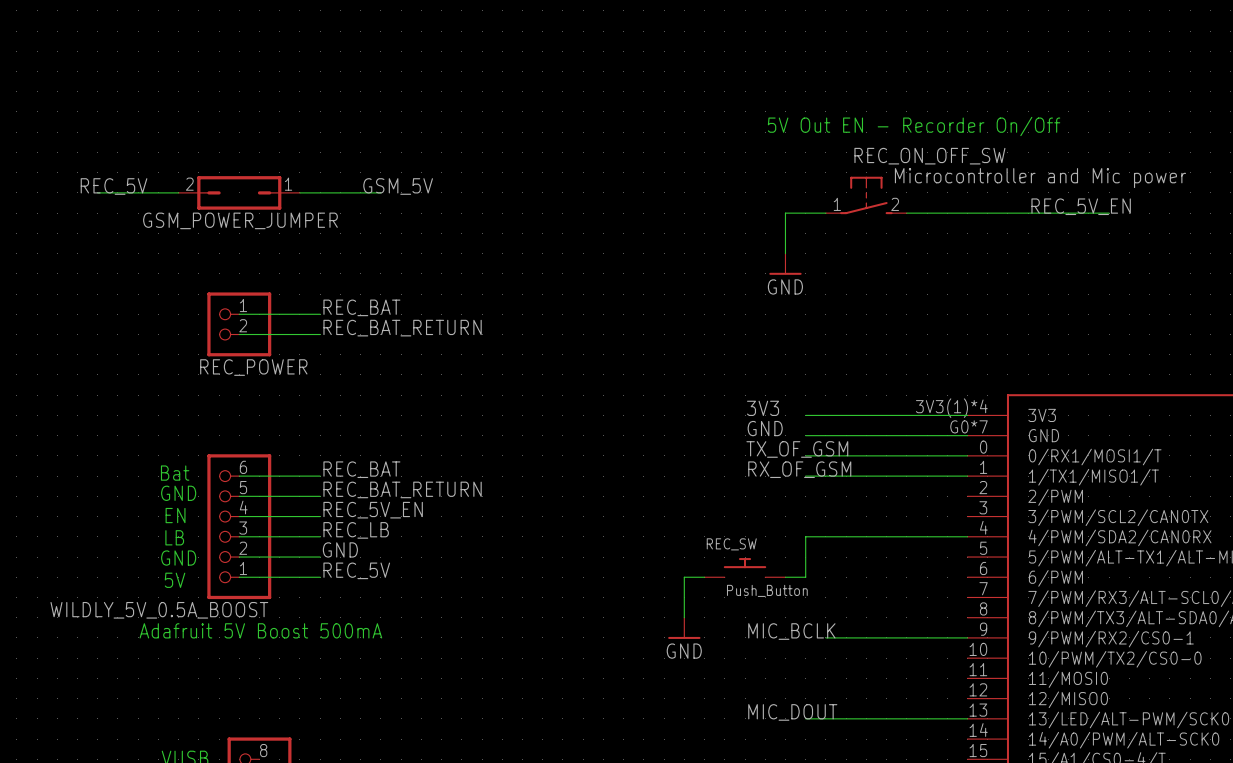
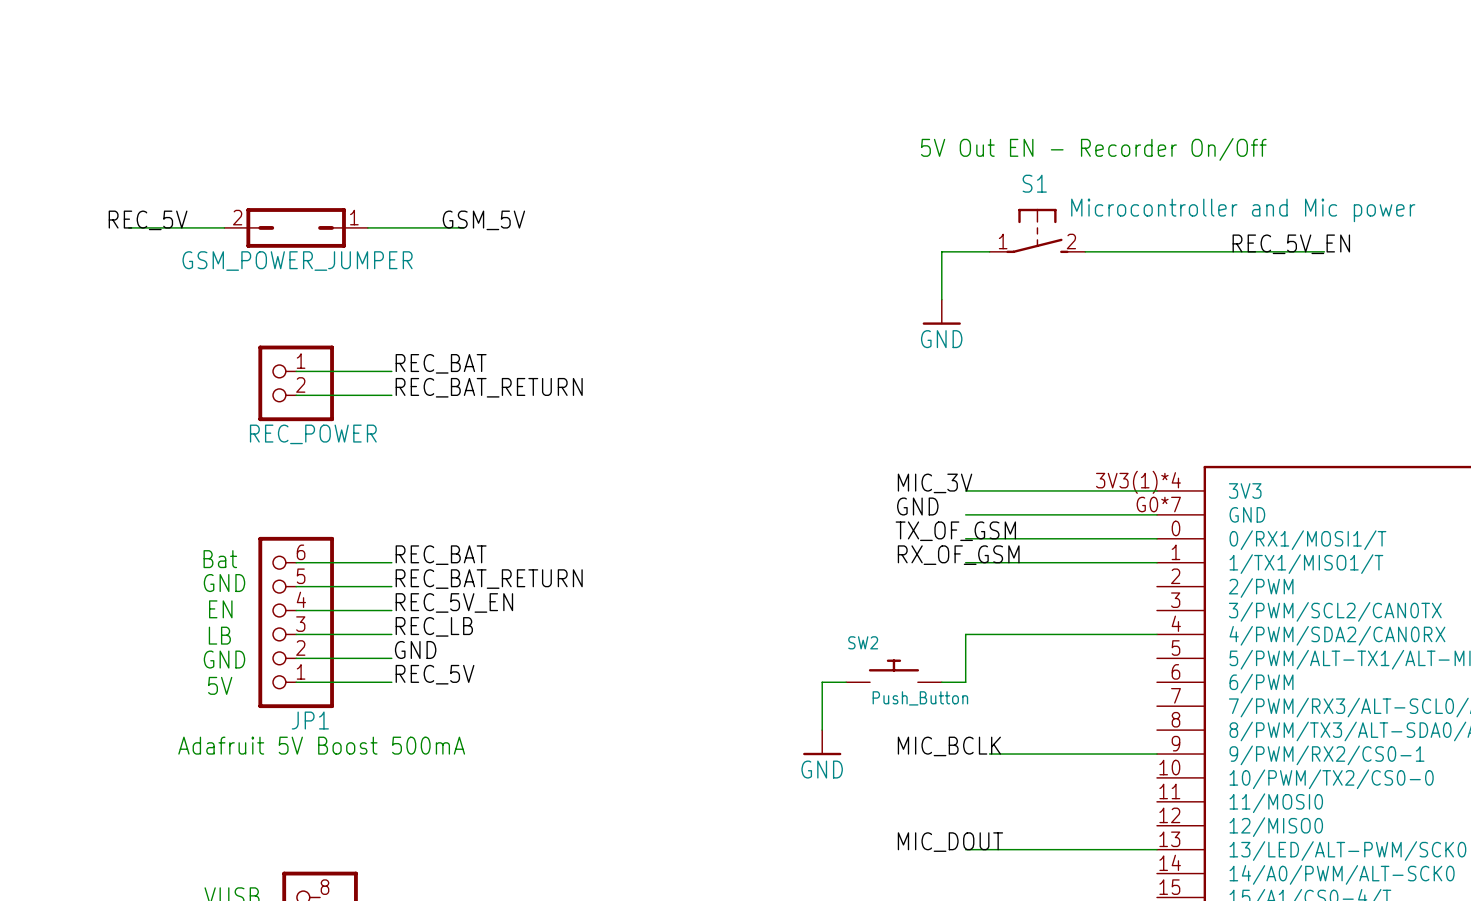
REC_ON_OFF_SW name: REC_ON_OFF_SW (929, 156) -> S1 (1034, 183)
label: 3V3 (763, 408) -> MIC_3V (935, 483)
REC_SW name: REC_SW (731, 544) -> SW2 (863, 642)
WILDLY_5V_0.5A_BOOST name: WILDLY_5V_0.5A_BOOST (159, 610) -> JP1 (310, 720)

